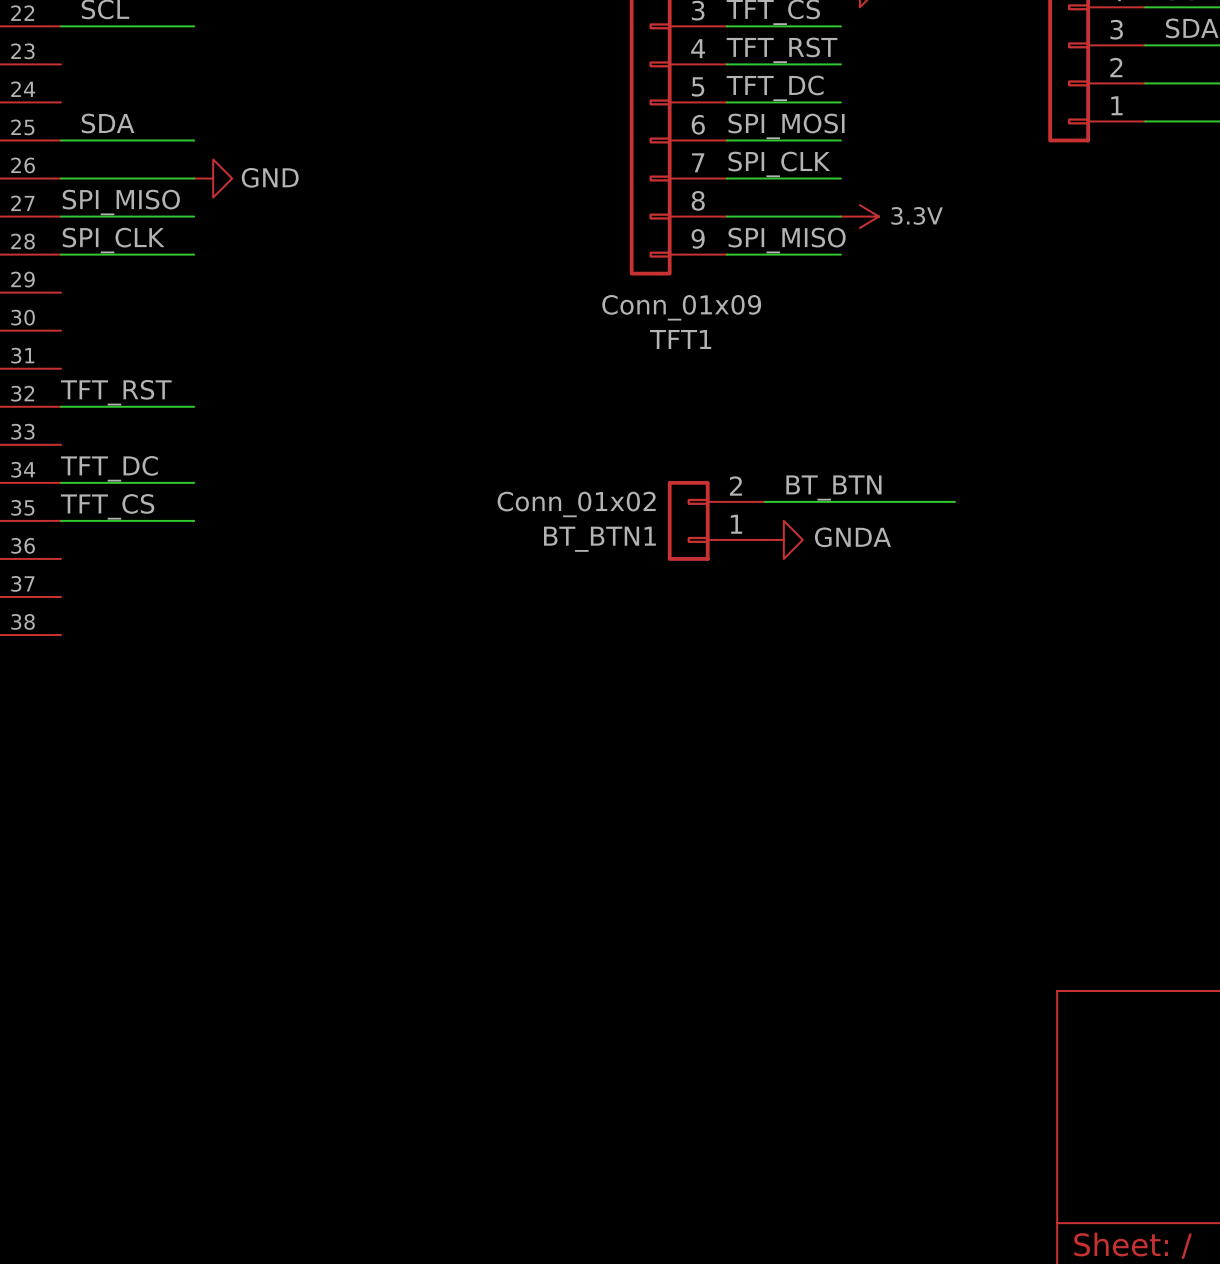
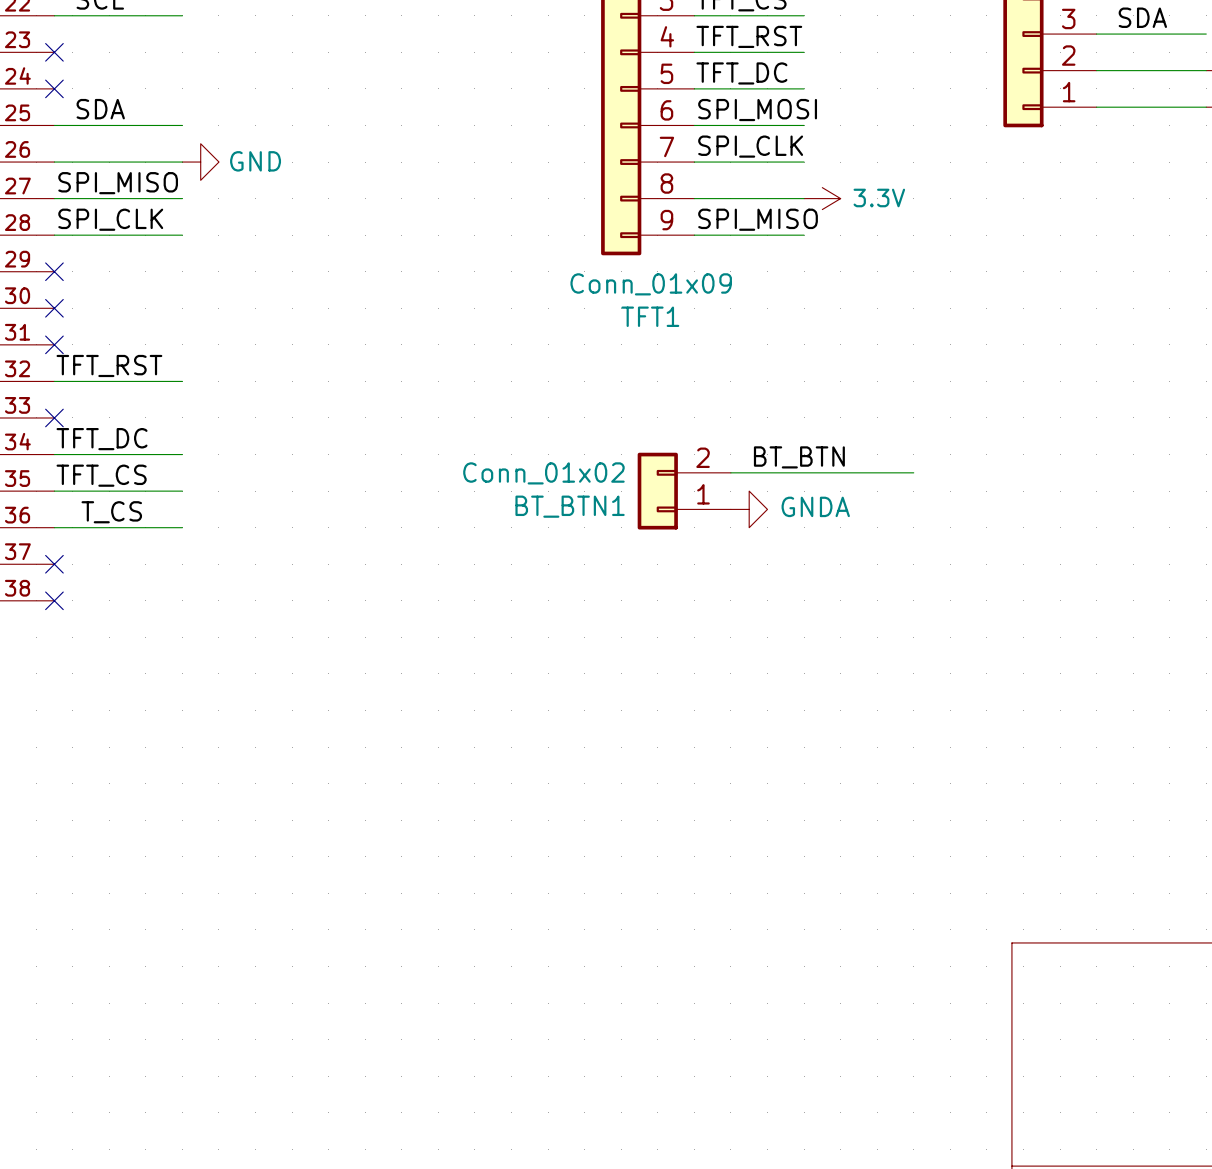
no-connect mark: none -> (54, 52)
no-connect mark: none -> (54, 88)
no-connect mark: none -> (54, 271)
no-connect mark: none -> (54, 308)
no-connect mark: none -> (54, 344)
no-connect mark: none -> (54, 417)
label: none -> T_CS (111, 512)
wire: none -> (54, 527) (182, 527)
no-connect mark: none -> (54, 564)
no-connect mark: none -> (54, 600)

